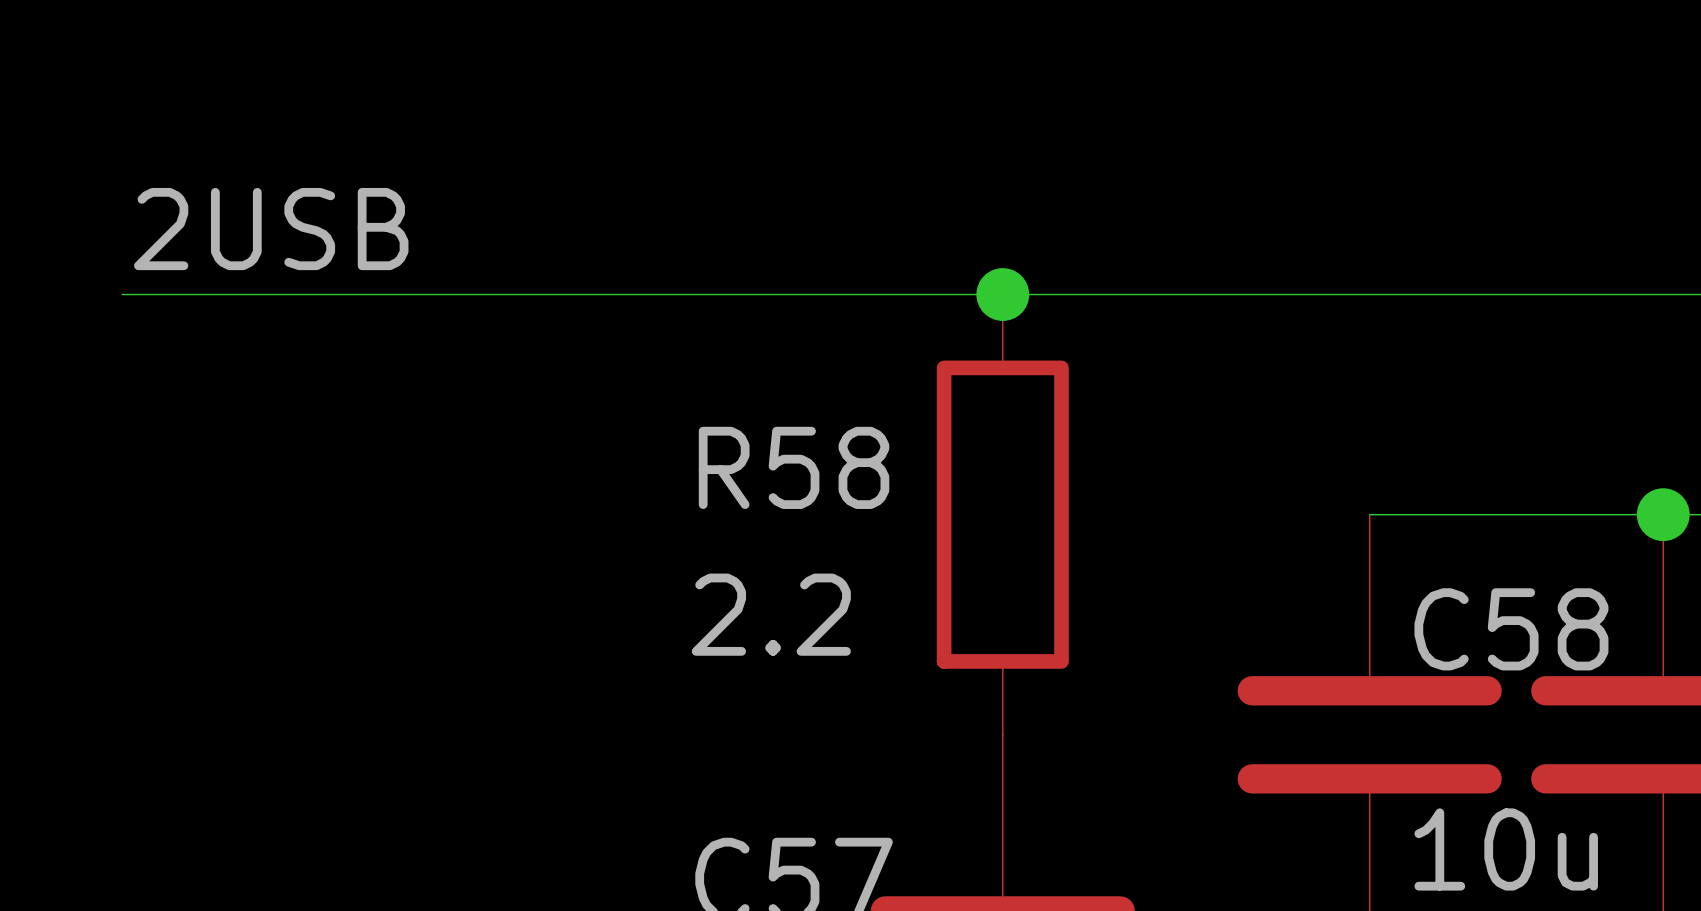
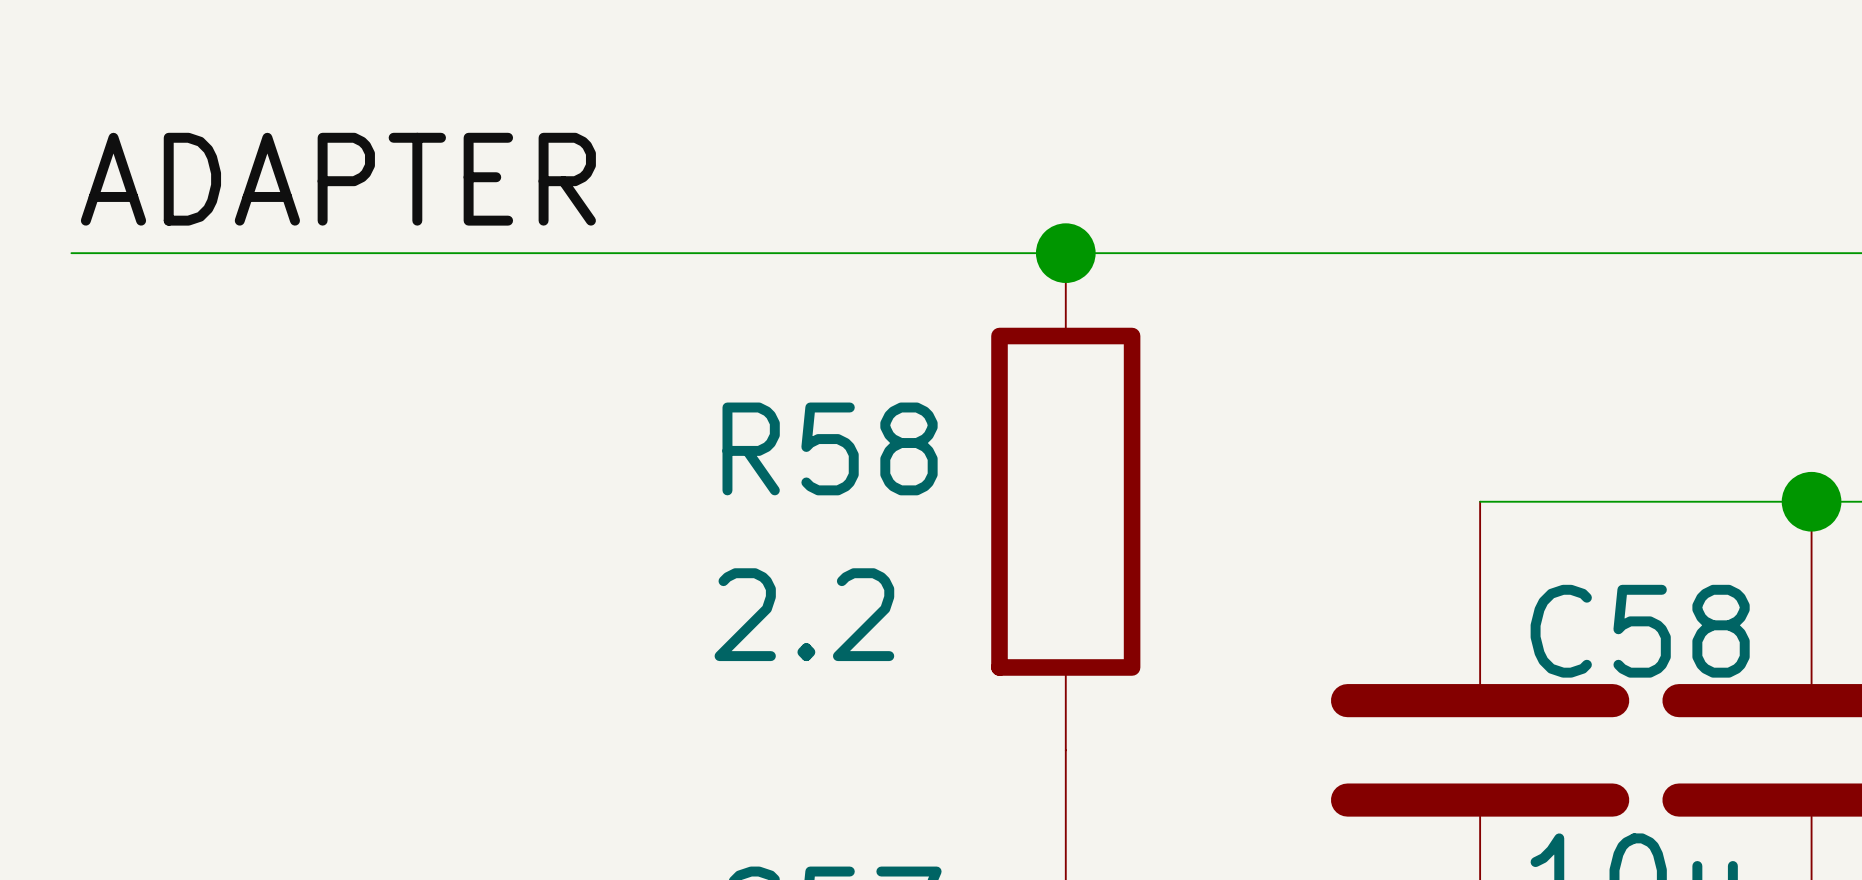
label: 2USB (271, 229) -> ADAPTER (338, 179)

